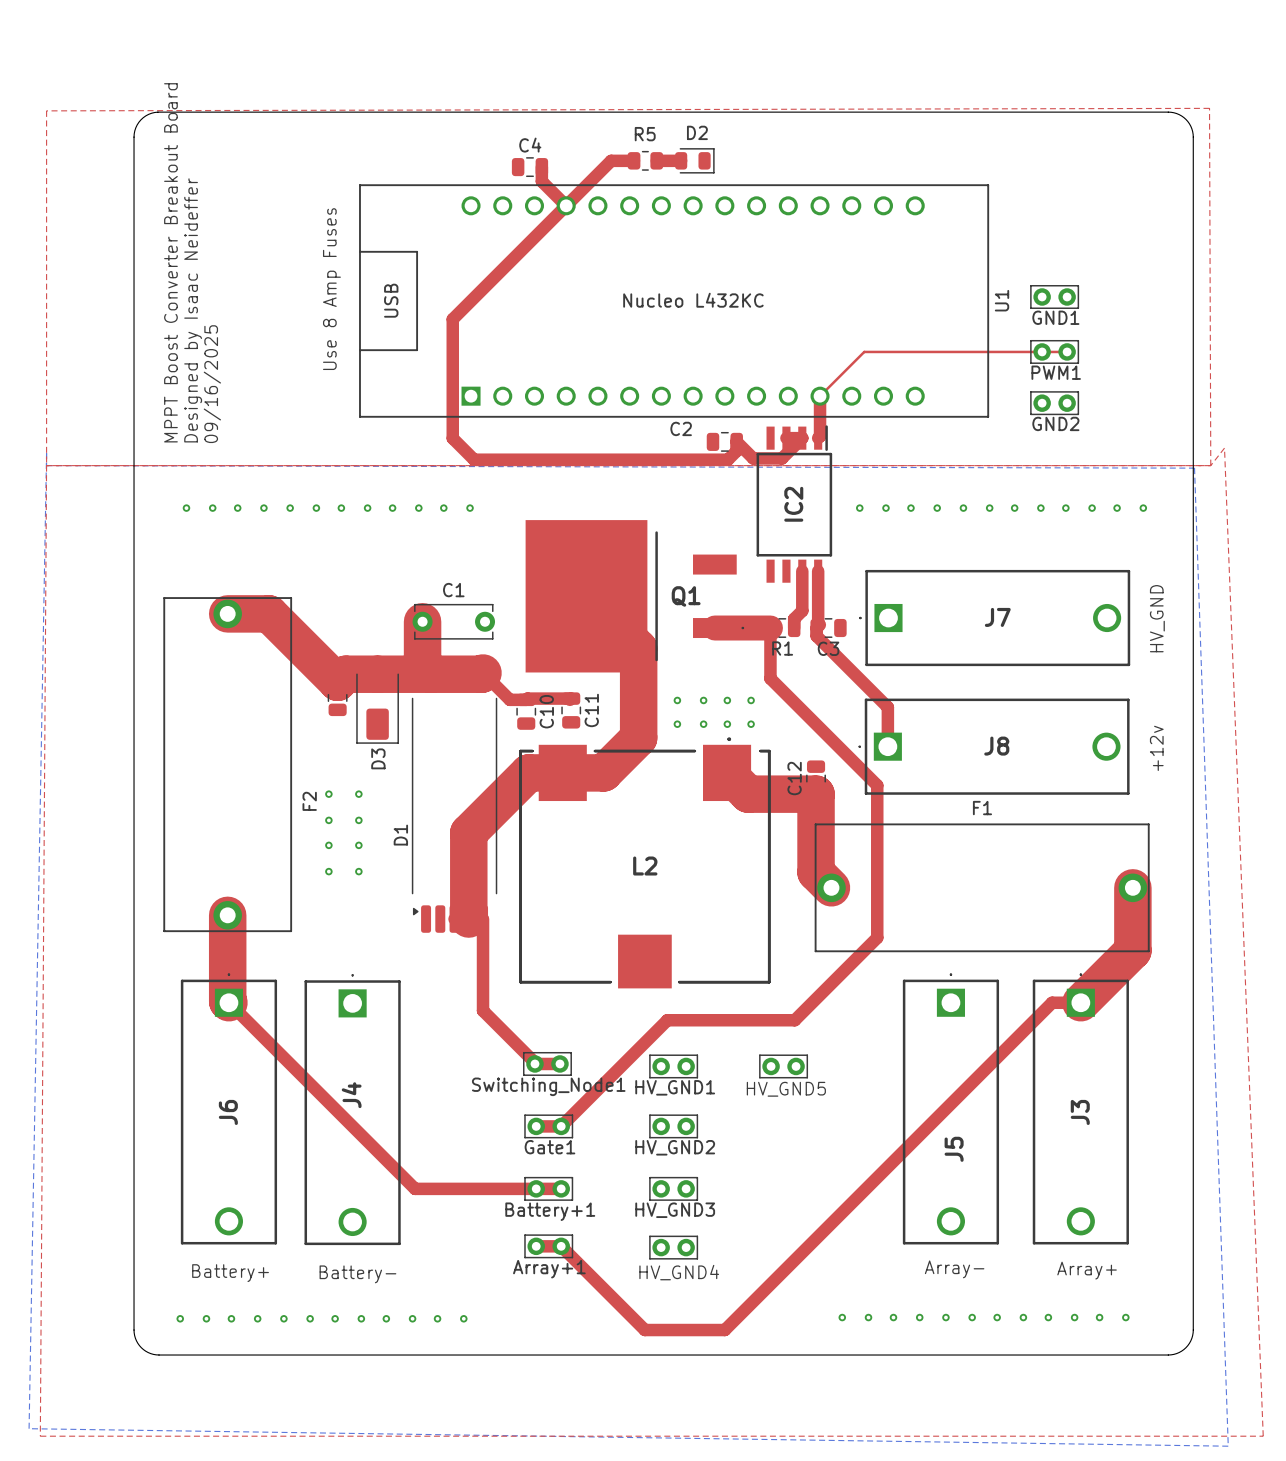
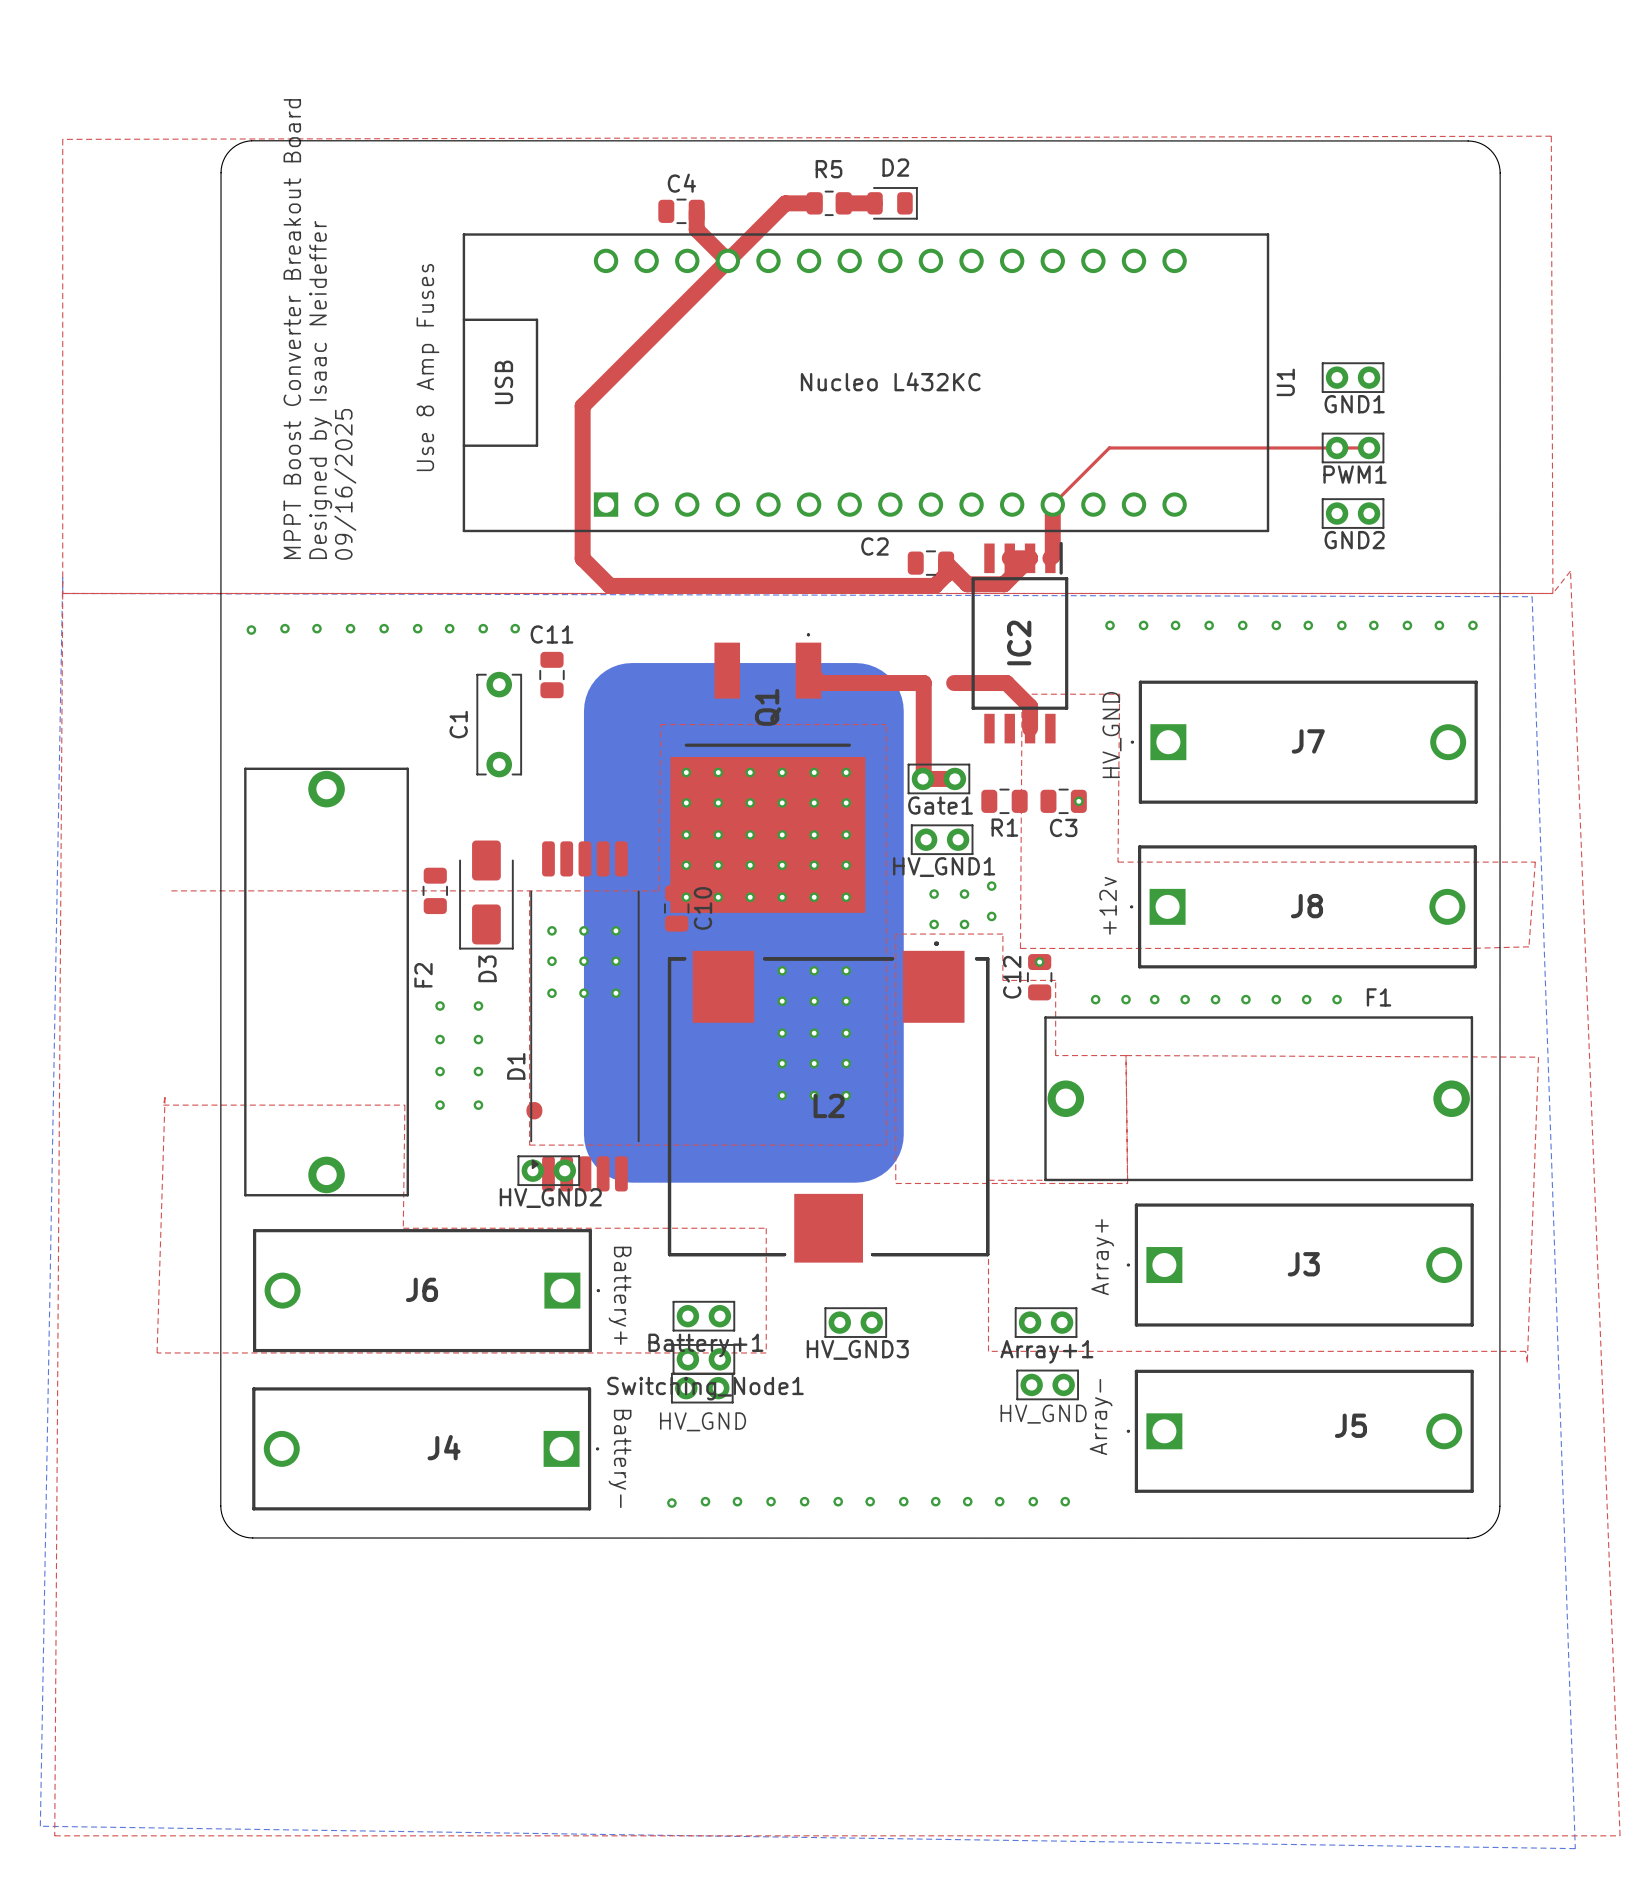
board edge: (157, 112) (1168, 112) (1179, 114) (1187, 121) (1193, 137) (1193, 1330) (1190, 1340) (1183, 1349) (1168, 1355) (158, 1355) (148, 1352) (139, 1345) (134, 1330) (134, 137) (135, 127) (140, 119) (148, 114) (157, 112) -> (251, 140) (239, 143) (229, 150) (223, 160) (221, 172) (220, 1506) (222, 1516) (227, 1525) (238, 1534) (252, 1537) (1467, 1538) (1478, 1536) (1487, 1531) (1496, 1520) (1499, 1506) (1500, 172) (1498, 162) (1493, 153) (1482, 144) (1468, 140) (251, 140)
text position: MPPT Boost Converter Breakout Board (170, 262) -> MPPT Boost Converter Breakout Board (292, 329)
text position: Designed by Isaac Neideffer (193, 310) -> Designed by Isaac Neideffer (320, 389)
text position: 09/16/2025 (212, 384) -> 09/16/2025 (345, 484)
via: none -> (1110, 625)
via: none -> (1143, 625)
via: none -> (1175, 625)
via: none -> (1209, 625)
via: none -> (1242, 625)
via: none -> (1276, 625)
via: none -> (1308, 625)
via: none -> (1341, 625)
via: none -> (1373, 625)
via: none -> (1407, 625)
via: none -> (1439, 625)
via: none -> (1472, 625)
via: none -> (284, 628)
via: none -> (316, 628)
via: none -> (350, 628)
via: none -> (384, 628)
via: none -> (417, 628)
via: none -> (449, 628)
via: none -> (483, 628)
via: none -> (515, 628)
via: none -> (251, 630)
via: (186, 508) -> none
via: (212, 508) -> none
via: (237, 508) -> none
via: (263, 508) -> none
via: (290, 508) -> none
via: (316, 508) -> none
via: (341, 508) -> none
via: (367, 508) -> none
via: (392, 508) -> none
via: (418, 508) -> none
via: (443, 508) -> none
via: (470, 508) -> none
via: (859, 508) -> none
via: (885, 508) -> none
via: (910, 508) -> none
via: (937, 508) -> none
via: (963, 508) -> none
via: (989, 508) -> none
via: (1014, 508) -> none
via: (1040, 508) -> none
via: (1065, 508) -> none
via: (1092, 508) -> none
via: (1117, 508) -> none
via: (1143, 508) -> none
top track: none -> (808, 670) (820, 683) (923, 683) (922, 778) (954, 778)
top zone outline: none -> (1022, 694) (1020, 948) (1528, 946) (1535, 862) (1118, 862) (1119, 694) (1022, 694)
top track: (802, 571) (802, 610) (794, 618) (794, 628) -> (1030, 728) (1030, 706) (1006, 683) (954, 683)
top track: (818, 571) (818, 626) -> none
C1 name position: C1 (453, 590) -> C1 (458, 724)
top track: (586, 596) (638, 648) (638, 737) (603, 772) (528, 772) (468, 832) (468, 919) (454, 919) -> none
Q1 rotation: 0° (634, 596) -> 90° counterclockwise (767, 773)
via: none -> (686, 772)
via: none -> (718, 772)
via: none -> (750, 772)
via: none -> (782, 772)
via: none -> (814, 772)
via: none -> (846, 772)
top track: (227, 613) (269, 613) (337, 682) (345, 674) (483, 672) (509, 699) (571, 698) (569, 699) -> none
J7 position: (994, 618) -> (1304, 742)
text position: HV_GND (1157, 618) -> HV_GND (1112, 735)
top track: (422, 621) (422, 665) (431, 674) -> none
C1 rotation: 0° (453, 621) -> 90° clockwise (499, 724)
C1 position: (453, 621) -> (499, 724)
top track: (819, 624) (816, 628) (816, 636) (887, 707) (887, 746) -> none
top track: (714, 628) (770, 628) (770, 678) (877, 785) (877, 937) (794, 1020) (667, 1020) (561, 1126) (536, 1126) -> none
via: none -> (1078, 801)
via: none -> (686, 802)
via: none -> (718, 802)
via: none -> (750, 802)
via: none -> (782, 802)
via: none -> (814, 802)
via: none -> (846, 802)
via: none -> (686, 834)
via: none -> (718, 834)
via: none -> (750, 834)
via: none -> (782, 834)
via: none -> (814, 834)
via: none -> (846, 834)
via: none -> (686, 865)
via: none -> (718, 865)
via: none -> (750, 865)
via: none -> (782, 865)
via: none -> (814, 865)
via: none -> (846, 865)
via: none -> (991, 886)
top zone outline: none -> (171, 890) (659, 890) (660, 724) (886, 724) (886, 1145) (529, 1145) (529, 890)
via: (677, 700) -> none
via: (703, 700) -> none
via: none -> (686, 897)
via: none -> (718, 897)
via: none -> (750, 897)
via: none -> (782, 897)
via: none -> (814, 897)
via: none -> (846, 897)
C11 position: (571, 710) -> (551, 675)
C11 name rotation: 0° (591, 710) -> 90° clockwise (551, 634)
via: none -> (991, 916)
part: none -> (743, 922)
via: (677, 724) -> none
via: (703, 724) -> none
via: none -> (551, 930)
via: none -> (583, 930)
via: none -> (615, 930)
J8 position: (994, 746) -> (1303, 906)
text position: +12v (1156, 748) -> +12v (1108, 905)
via: none -> (551, 961)
via: none -> (583, 961)
via: none -> (615, 961)
via: none -> (1039, 962)
via: none -> (782, 970)
via: none -> (814, 970)
via: none -> (846, 970)
F2 position: (227, 764) -> (326, 982)
top track: (727, 772) (748, 794) (816, 794) (816, 872) (831, 887) -> none
via: none -> (551, 993)
via: none -> (583, 993)
via: none -> (615, 993)
C12 position: (816, 778) -> (1039, 977)
via: none -> (1095, 999)
via: none -> (1126, 999)
via: none -> (1154, 999)
via: none -> (1185, 999)
via: none -> (1215, 999)
via: none -> (1245, 999)
via: none -> (1276, 999)
via: none -> (1306, 999)
via: none -> (1337, 999)
via: none -> (782, 1001)
via: none -> (814, 1001)
via: none -> (846, 1001)
via: none -> (440, 1006)
via: none -> (478, 1006)
via: (328, 794) -> none
via: (358, 794) -> none
F2 name position: F2 (309, 801) -> F2 (423, 975)
F1 name position: F1 (982, 808) -> F1 (1379, 997)
via: none -> (782, 1033)
via: none -> (814, 1033)
via: none -> (846, 1033)
via: none -> (440, 1039)
via: none -> (478, 1039)
via: (328, 820) -> none
via: (358, 820) -> none
top zone outline: none -> (1126, 1055) (1127, 1183) (895, 1183) (895, 934) (1002, 934) (1002, 980) (1055, 980) (1055, 1055) (1126, 1055)
top zone outline: none -> (1126, 1055) (1127, 1180) (988, 1180) (988, 1351) (1525, 1351) (1527, 1362) (1538, 1057) (1126, 1055)
via: none -> (782, 1063)
via: none -> (814, 1063)
via: none -> (846, 1063)
via: none -> (440, 1071)
via: none -> (478, 1071)
via: (328, 845) -> none
via: (358, 845) -> none
via: none -> (782, 1095)
via: none -> (814, 1095)
via: none -> (846, 1095)
top zone outline: none -> (165, 1097) (157, 1352) (766, 1352) (766, 1228) (403, 1228) (404, 1105) (163, 1105) (165, 1097)
via: none -> (440, 1105)
via: none -> (478, 1105)
top track: none -> (534, 1109) (534, 1111)
via: (328, 871) -> none
via: (358, 871) -> none
F1 position: (982, 887) -> (1258, 1098)
top track: (1132, 887) (1132, 950) (1080, 1002) (1052, 1002) (724, 1330) (644, 1330) (561, 1246) (536, 1246) -> none
top track: (227, 915) (227, 1001) (415, 1188) (561, 1188) -> none
top track: (483, 919) (483, 1010) (534, 1063) (559, 1063) -> none
text: none -> Array+ (1102, 1257)
text: none -> Battery+ (620, 1295)
HV_GND1 position: (673, 1066) -> (942, 839)
part position: (783, 1066) -> (1047, 1384)
part: none -> (702, 1388)
text: HV_GND5 (786, 1089) -> HV_GND (1043, 1414)
J6 rotation: 0° (228, 1108) -> 90° clockwise (426, 1290)
J5 rotation: 0° (950, 1108) -> 90° counterclockwise (1300, 1431)
J3 rotation: 0° (1080, 1108) -> 90° counterclockwise (1300, 1265)
J4 rotation: 0° (352, 1109) -> 90° clockwise (425, 1448)
text: none -> HV_GND (703, 1421)
Gate1 position: (548, 1126) -> (938, 778)
HV_GND2 position: (673, 1126) -> (548, 1170)
via: none -> (705, 1501)
via: none -> (737, 1501)
via: none -> (771, 1501)
via: none -> (804, 1501)
via: none -> (838, 1501)
via: none -> (870, 1501)
via: none -> (903, 1501)
via: none -> (935, 1501)
via: none -> (967, 1501)
via: none -> (999, 1501)
via: none -> (1033, 1501)
via: none -> (1065, 1501)
via: none -> (671, 1503)
Battery+1 position: (548, 1188) -> (703, 1316)
HV_GND3 position: (673, 1188) -> (855, 1322)
Array+1 position: (548, 1246) -> (1046, 1322)
part: (673, 1247) -> none
text rotation: 0° (954, 1269) -> 90° counterclockwise (1101, 1417)
text position: Array- (954, 1269) -> Array- (1101, 1417)
text: Array+ (1087, 1270) -> none
text: HV_GND4 (679, 1272) -> none
text: Battery+ (230, 1273) -> none
text rotation: 0° (357, 1274) -> 90° clockwise (620, 1458)
text position: Battery- (357, 1274) -> Battery- (620, 1458)
via: (842, 1317) -> none
via: (868, 1317) -> none
via: (893, 1317) -> none
via: (919, 1317) -> none
via: (945, 1317) -> none
via: (972, 1317) -> none
via: (997, 1317) -> none
via: (1023, 1317) -> none
via: (1048, 1317) -> none
via: (1074, 1317) -> none
via: (1099, 1317) -> none
via: (1125, 1317) -> none
via: (180, 1318) -> none
via: (206, 1318) -> none
via: (231, 1318) -> none
via: (257, 1318) -> none
via: (283, 1318) -> none
via: (310, 1318) -> none
via: (335, 1318) -> none
via: (361, 1318) -> none
via: (386, 1318) -> none
via: (412, 1318) -> none
via: (437, 1318) -> none
via: (463, 1318) -> none

